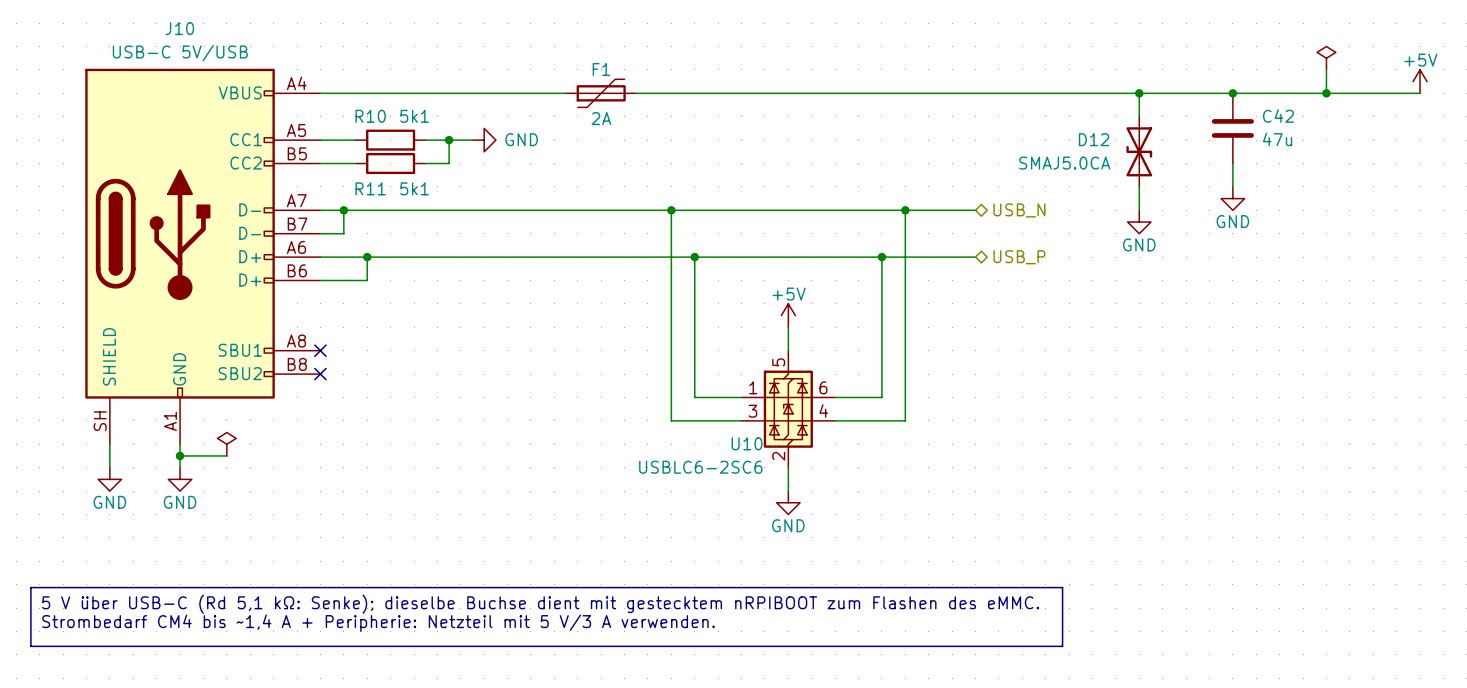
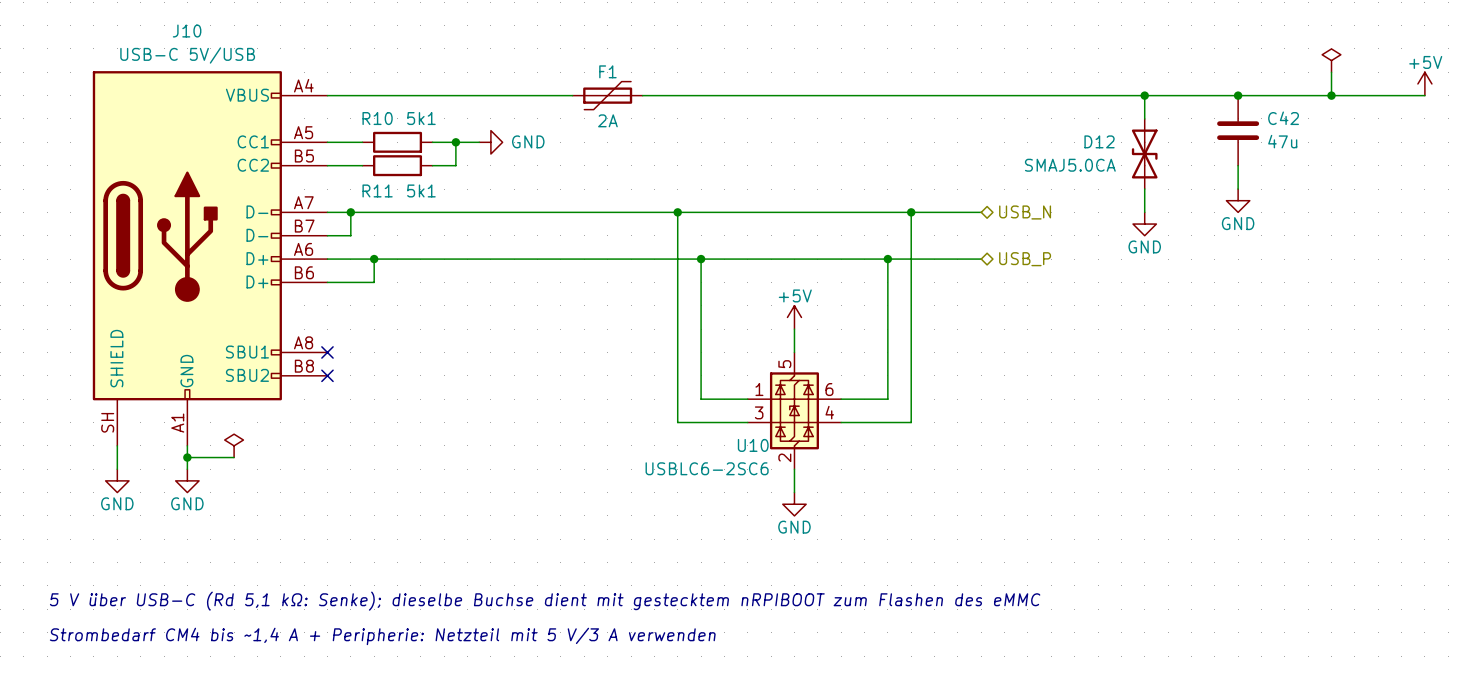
line: (30, 587) (1062, 587) (1062, 646) (30, 646) (30, 587) -> none
text: 5 V über USB-C (Rd 5,1 kΩ: Senke); dieselbe Buchse dient mit gestecktem nRPIBOOT zum Flashen des eMMC. (540, 604) -> 5 V über USB-C (Rd 5,1 kΩ: Senke); dieselbe Buchse dient mit gestecktem nRPIBOOT zum Flashen des eMMC (545, 601)
text: Strombedarf CM4 bis ~1,4 A + Peripherie: Netzteil mit 5 V/3 A verwenden. (378, 623) -> Strombedarf CM4 bis ~1,4 A + Peripherie: Netzteil mit 5 V/3 A verwenden (382, 636)

